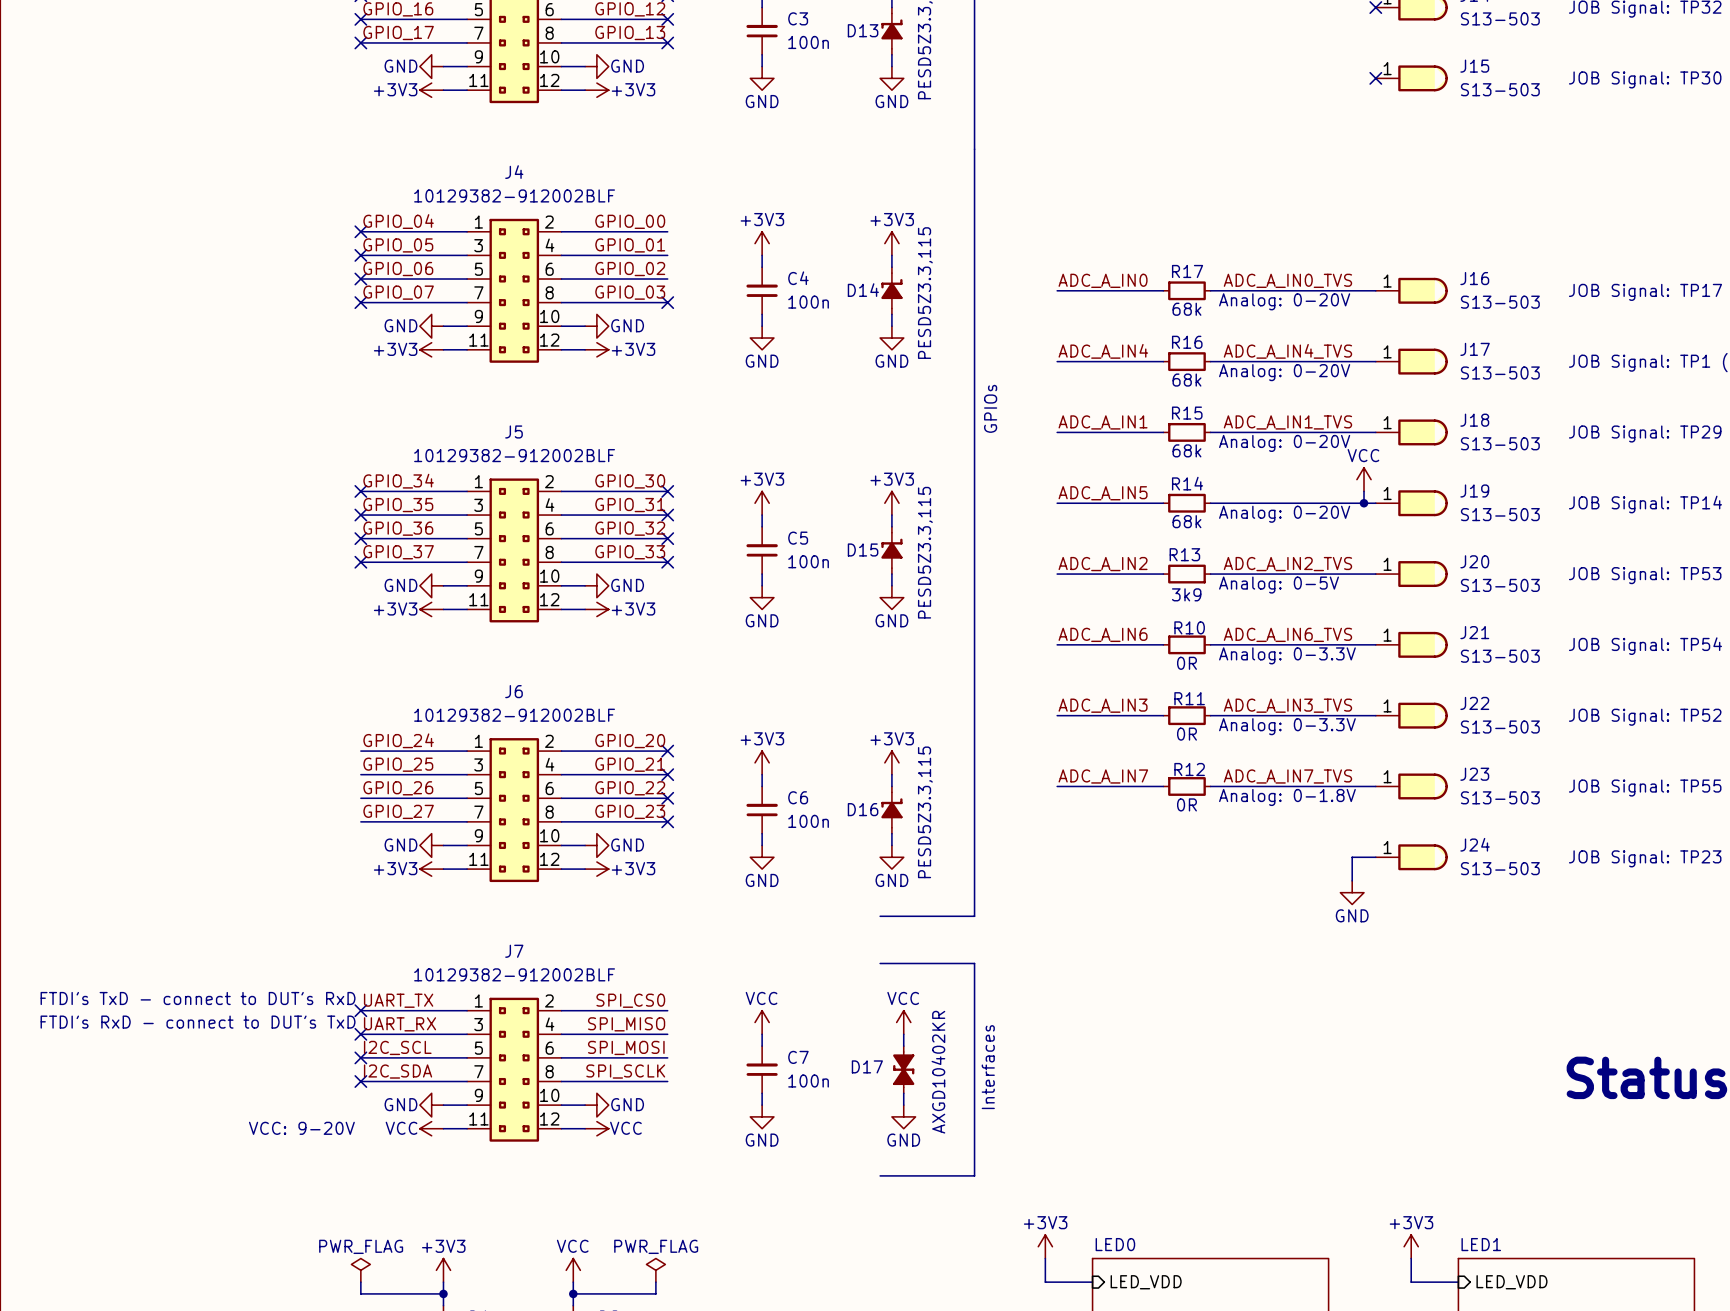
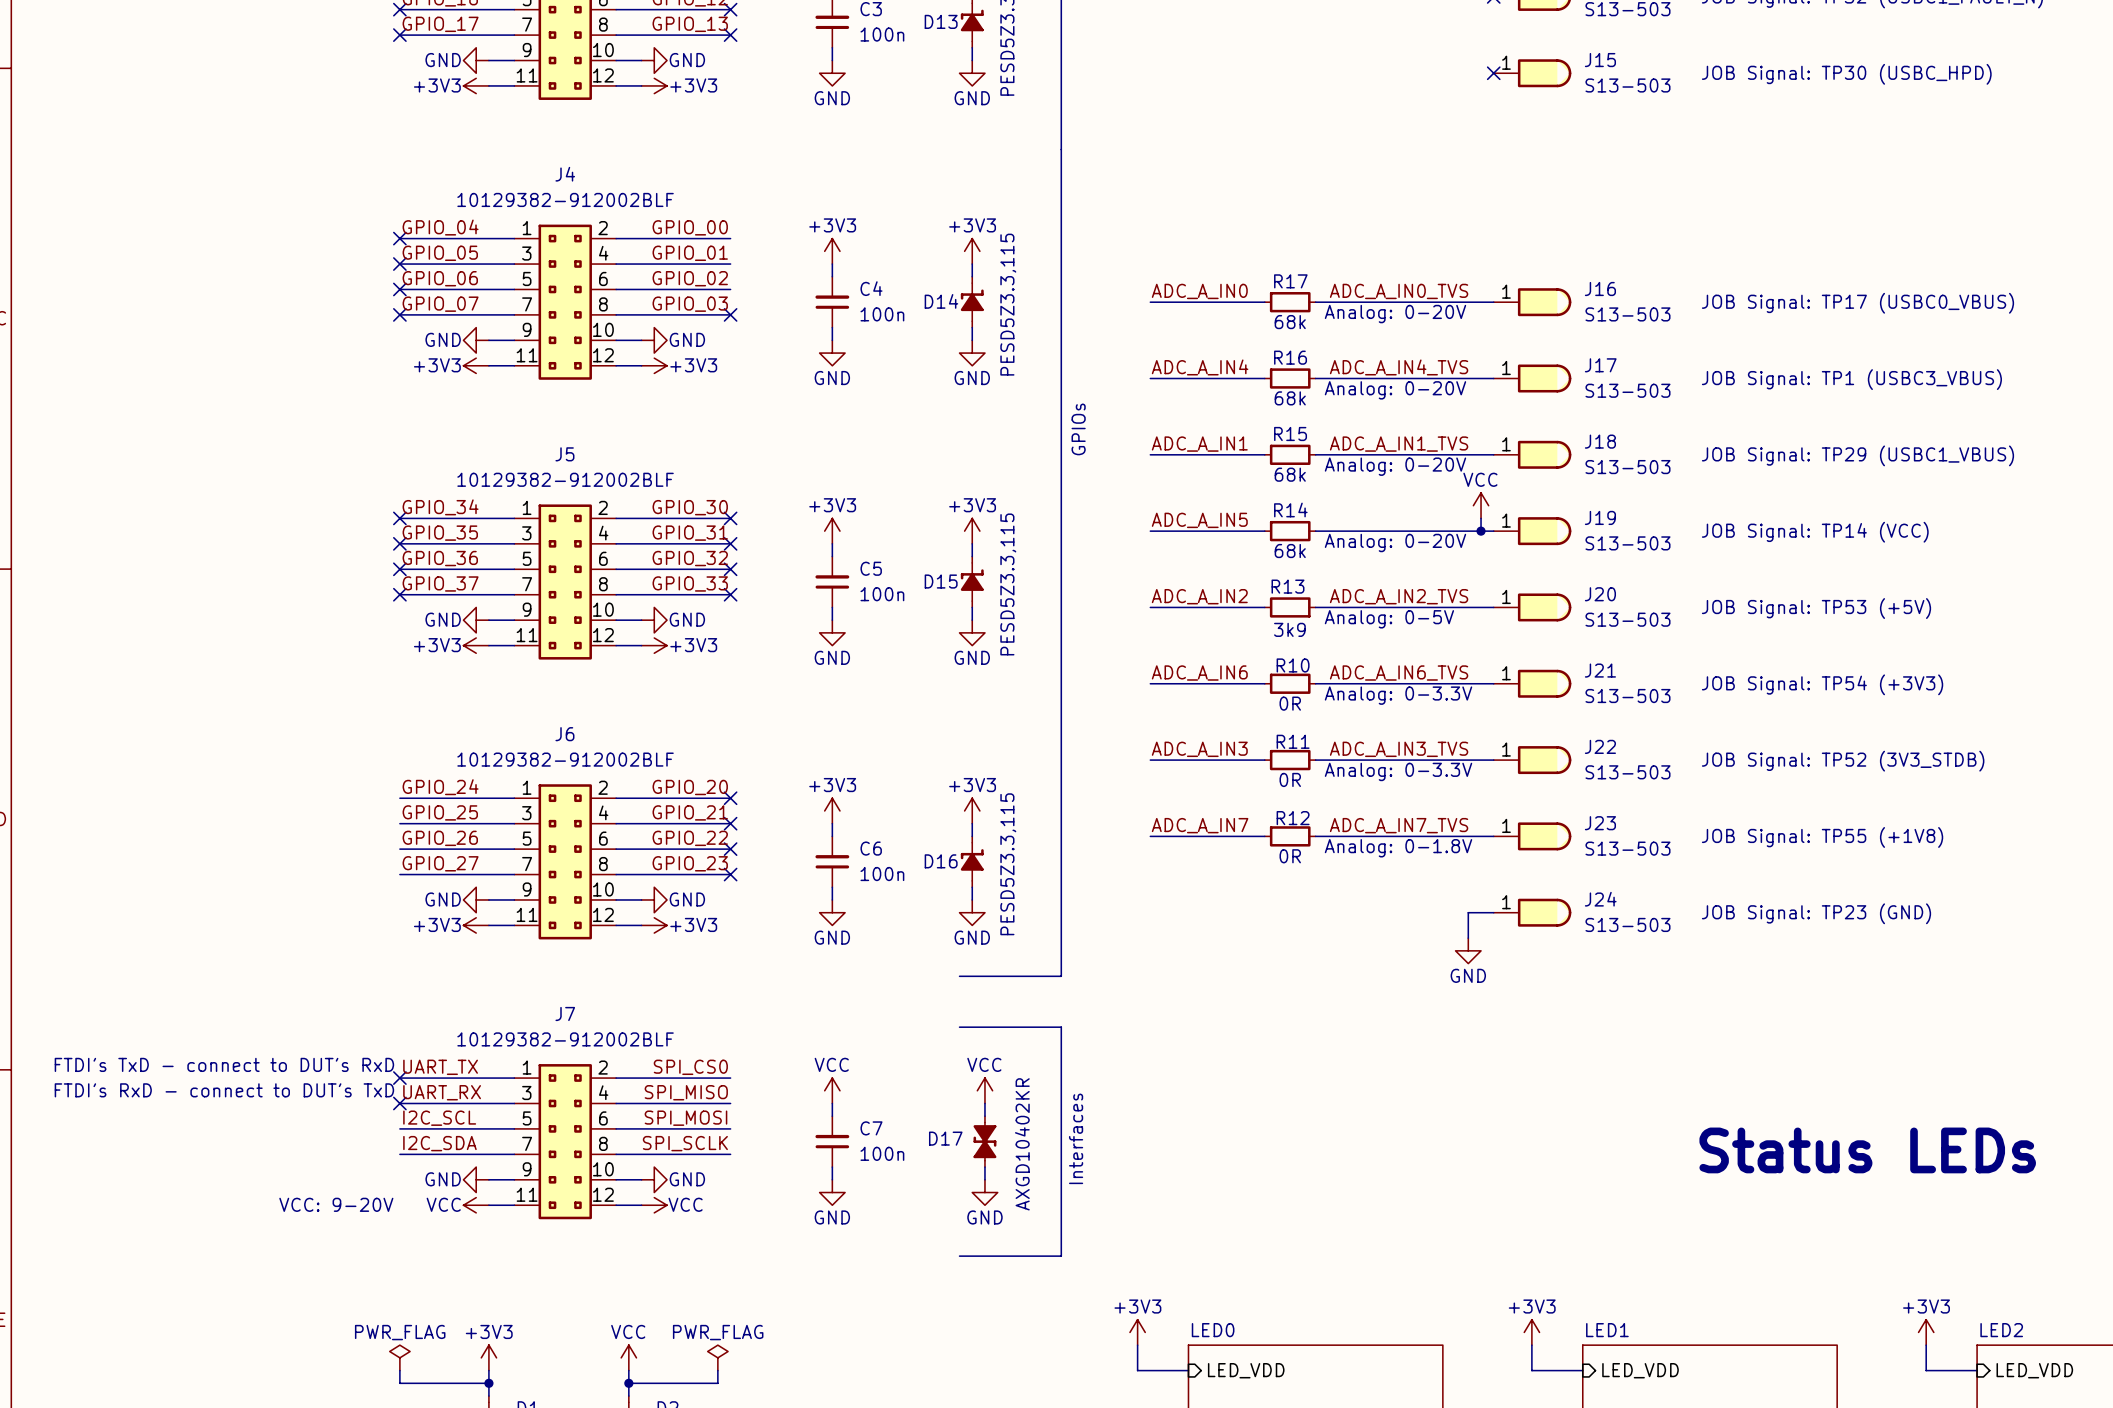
no-connect mark: (360, 1057) -> none
no-connect mark: (360, 1081) -> none

